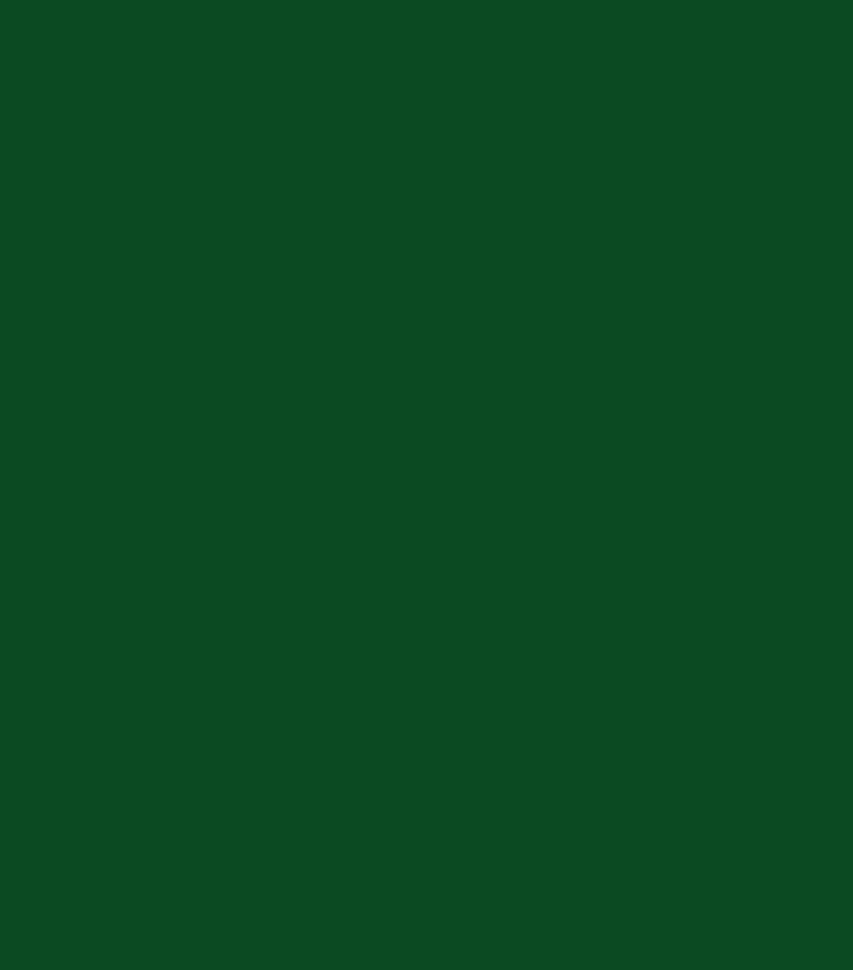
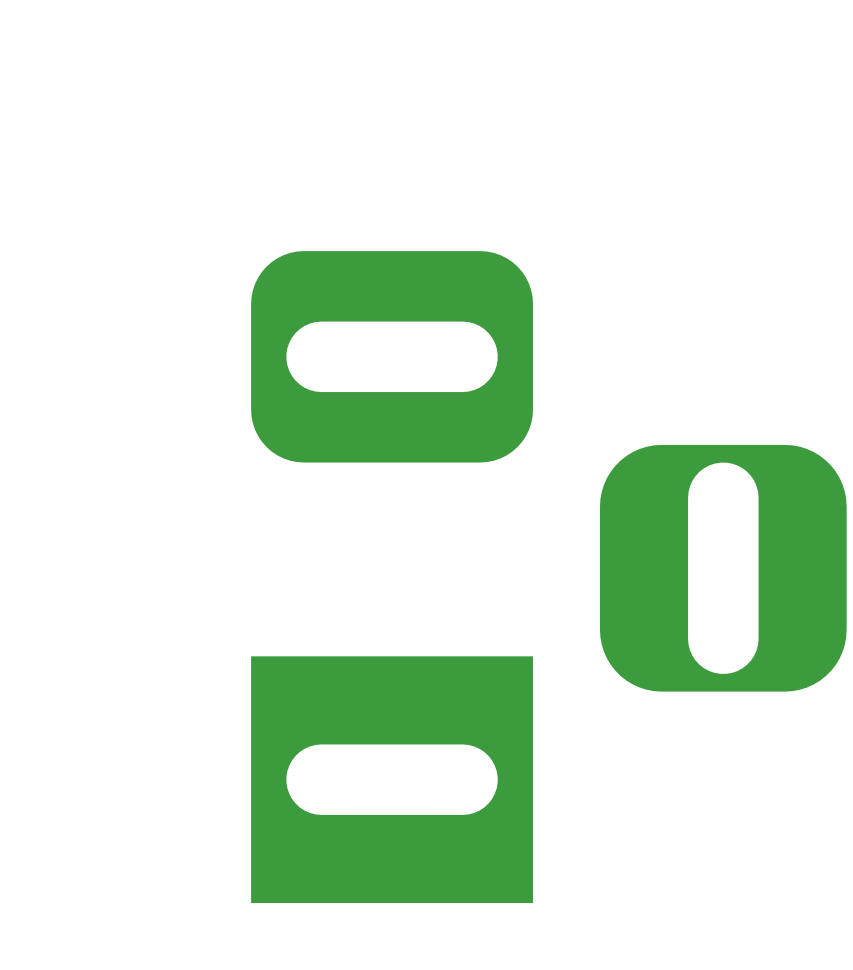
part: none -> (548, 577)

